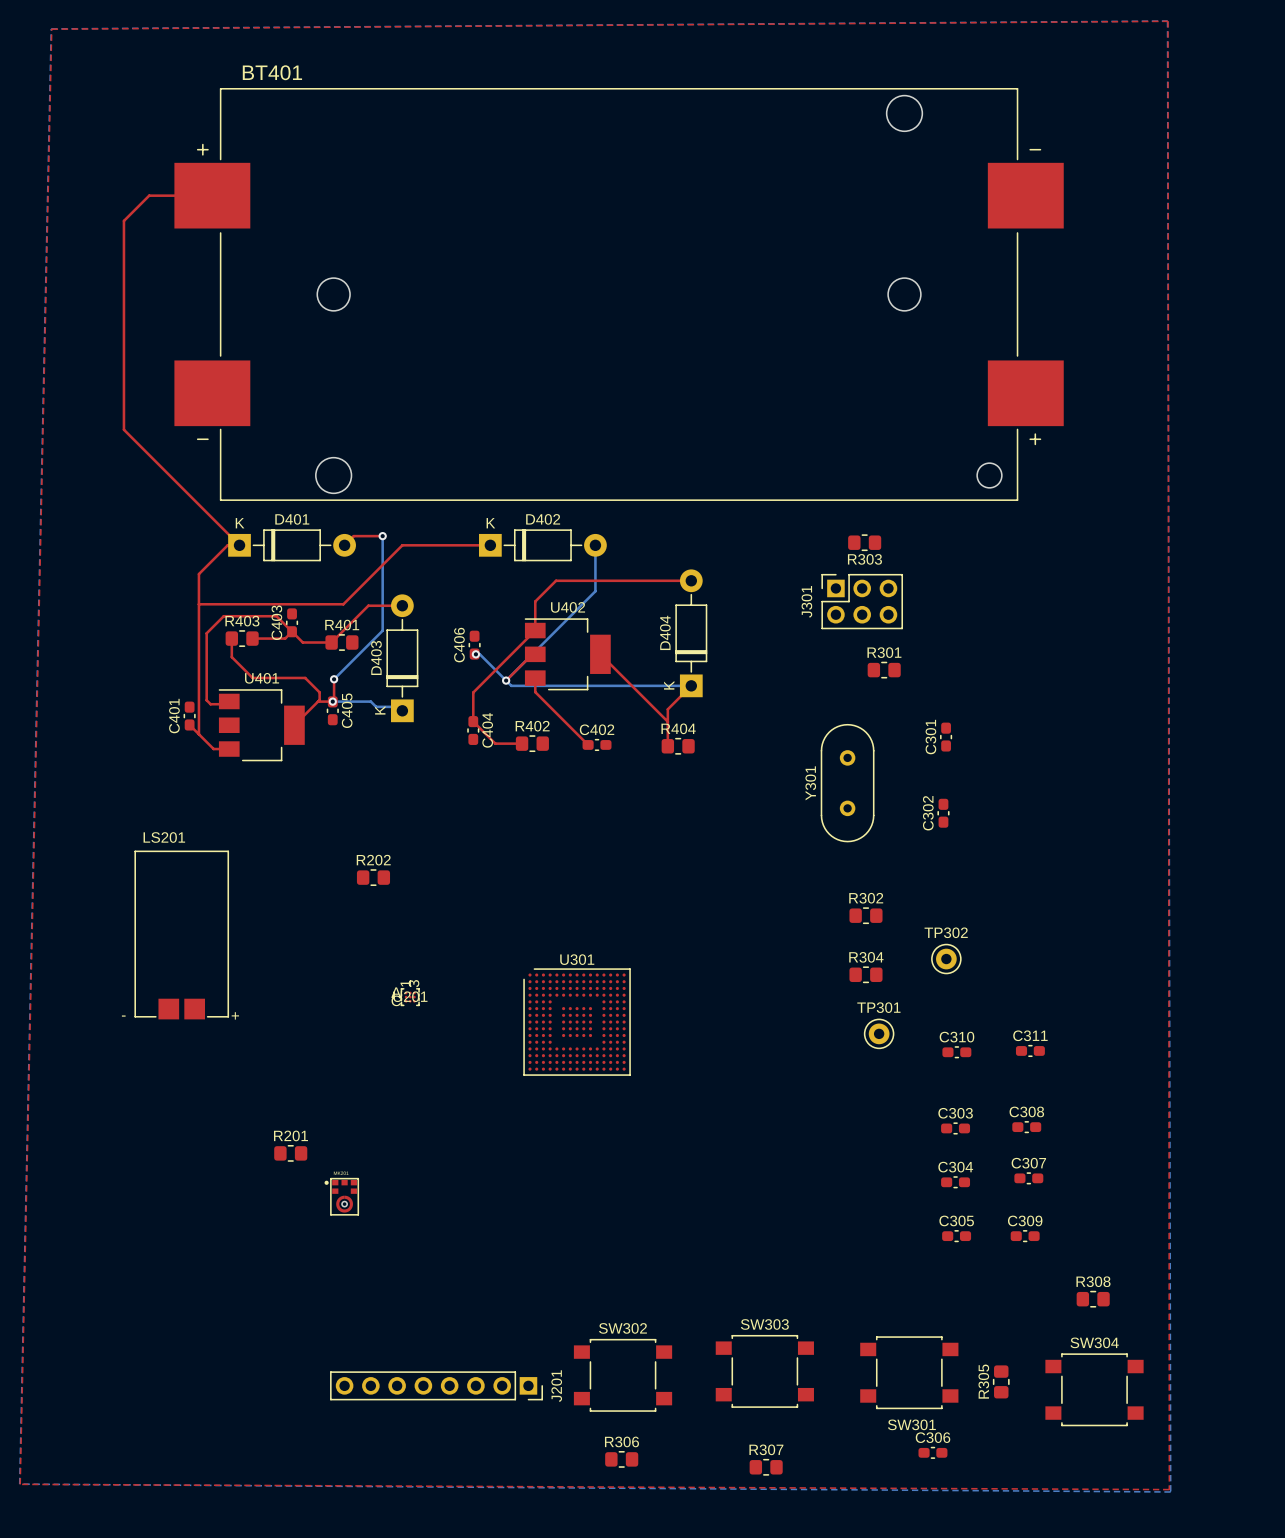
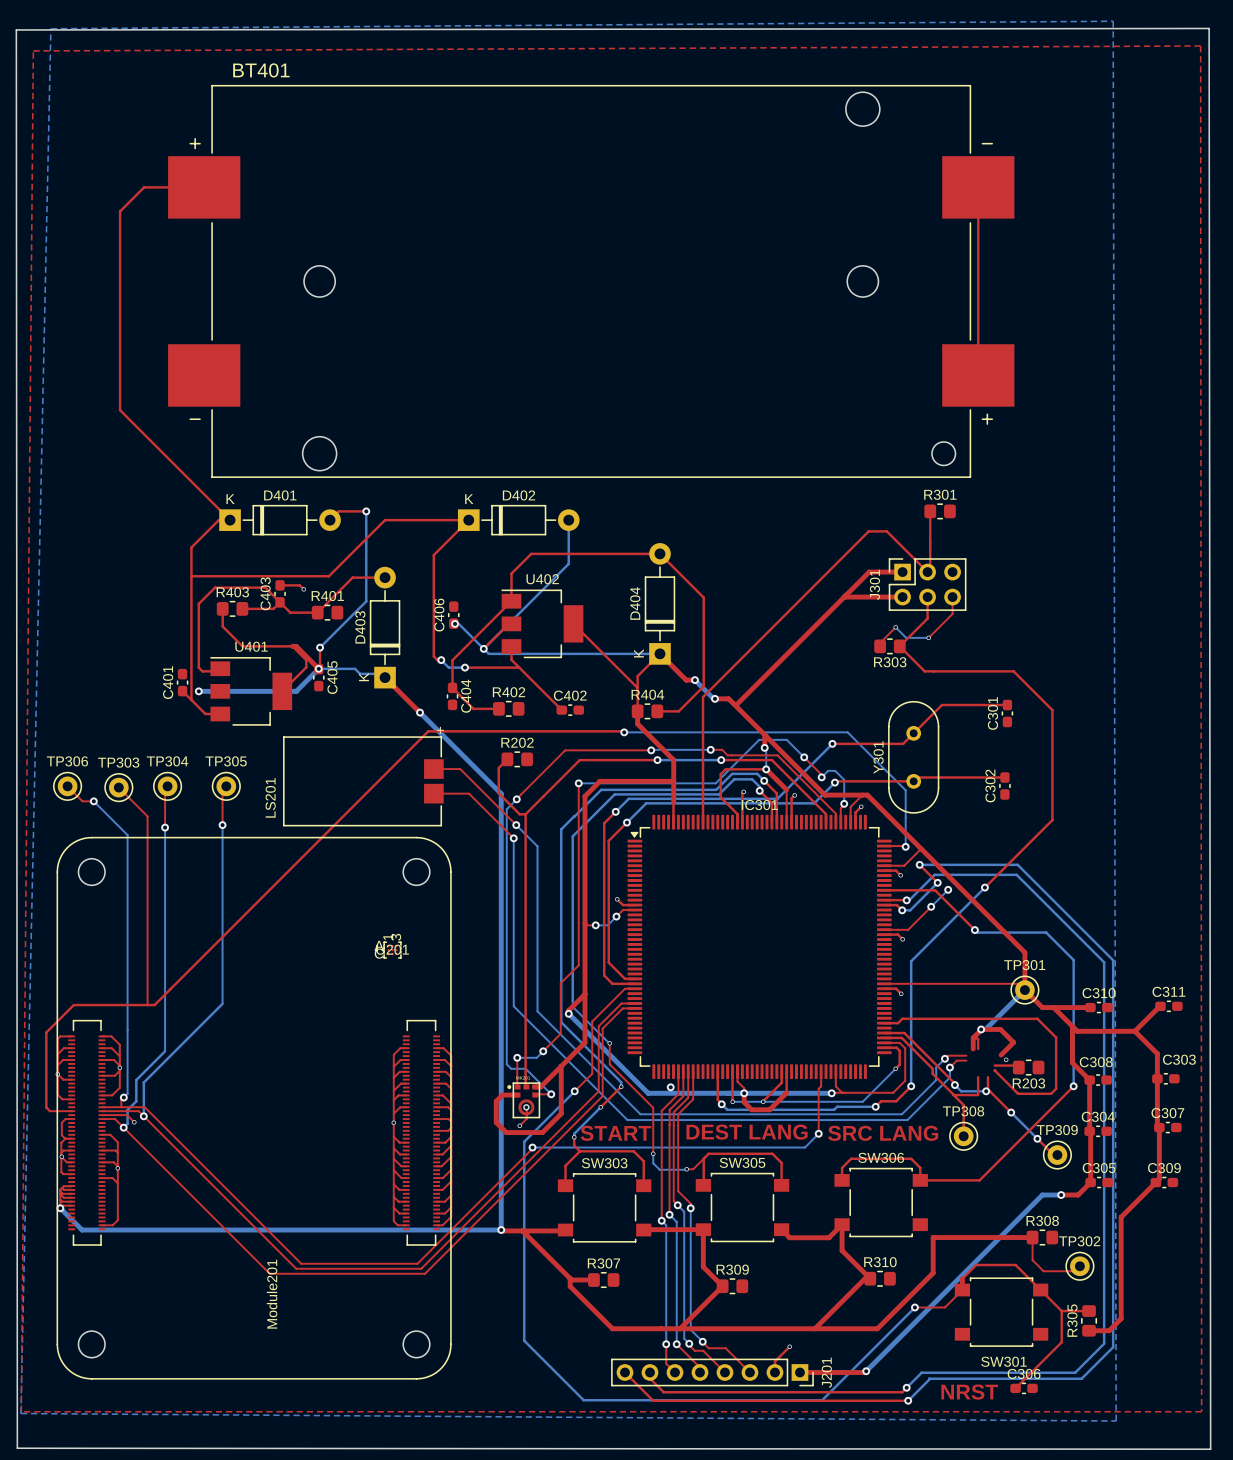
top zone outline: (1168, 21) (51, 29) (20, 1484) (1169, 1489) (1168, 21) -> (1200, 45) (33, 50) (21, 1411) (1201, 1411) (1200, 45)
board edge: none -> (1209, 28) (1210, 1449) (17, 1448) (16, 29) (1209, 28)
top track: none -> (978, 187) (978, 375)
top track: none -> (930, 511) (930, 569) (927, 572) (886, 531) (868, 531) (703, 697) (703, 822)
R303 position: (864, 542) -> (889, 646)
top track: none -> (468, 520) (433, 555) (433, 656) (437, 660) (441, 660)
top track: none -> (659, 553) (703, 597) (703, 686) (678, 711) (657, 711)
top track: none -> (902, 572) (869, 572) (737, 703) (733, 703)
J301 position: (862, 601) -> (927, 584)
top track: none -> (280, 585) (299, 585) (303, 589)
via: none -> (303, 589)
top track: none -> (844, 597) (902, 597)
top track: none -> (927, 597) (927, 618) (899, 646) (924, 671) (1013, 671) (1052, 710) (1052, 820) (984, 887)
top track: none -> (952, 597) (952, 613) (928, 637)
top track: none -> (895, 627) (880, 642) (880, 646)
bottom track: none -> (895, 627) (906, 637) (928, 637)
via: none -> (895, 627)
via: none -> (928, 637)
R301 position: (884, 670) -> (940, 511)
top track: none -> (659, 653) (686, 680) (694, 680)
bottom track: none -> (441, 660) (448, 667) (465, 667)
via: none -> (441, 660)
via: none -> (465, 667)
top track: none -> (519, 667) (465, 667)
top track: (318, 701) (332, 701) -> (292, 646) (296, 646) (318, 668)
bottom track: none -> (318, 668) (296, 691) (198, 691)
top track: none -> (385, 677) (420, 712)
via: none -> (694, 680)
bottom track: none -> (696, 680) (714, 698)
via: none -> (198, 691)
top track: none -> (714, 698) (728, 698) (824, 795) (867, 795) (1024, 952) (1024, 990)
via: none -> (714, 698)
C301 position: (946, 737) -> (1007, 713)
top track: none -> (1007, 705) (942, 705) (903, 743) (832, 743)
top track: none -> (637, 711) (637, 724) (673, 760) (673, 822)
bottom track: none -> (420, 712) (501, 793) (501, 1230) (82, 1230) (60, 1208)
via: none -> (420, 712)
top track: none -> (624, 732) (428, 731) (154, 1005) (73, 1005) (46, 1032) (46, 1107) (49, 1111) (71, 1111)
bottom track: none -> (624, 732) (847, 732) (905, 790) (905, 846)
via: none -> (624, 732)
top track: none -> (765, 735) (764, 747)
bottom track: none -> (832, 743) (777, 798) (628, 798) (615, 811)
via: none -> (832, 743)
Y301 position: (847, 783) -> (913, 757)
bottom track: none -> (764, 747) (766, 769)
via: none -> (764, 747)
top track: none -> (710, 749) (722, 749) (727, 755) (777, 755) (835, 813) (835, 822)
bottom track: none -> (710, 749) (651, 750)
via: none -> (710, 749)
top track: none -> (651, 750) (565, 750) (516, 799)
via: none -> (651, 750)
top track: none -> (804, 757) (821, 774) (821, 777)
bottom track: none -> (804, 757) (786, 739) (759, 739) (715, 783) (578, 783)
via: none -> (804, 757)
top track: none -> (507, 759) (498, 768) (498, 793) (519, 814) (525, 814)
top track: none -> (657, 760) (579, 760) (525, 814)
bottom track: none -> (657, 760) (721, 760)
via: none -> (657, 760)
top track: none -> (721, 760) (772, 760) (826, 814) (826, 822)
via: none -> (721, 760)
top track: none -> (433, 769) (460, 769) (516, 825)
via: none -> (766, 769)
C302 position: (943, 813) -> (1004, 785)
bottom track: none -> (821, 777) (828, 770) (835, 770) (844, 779) (844, 803)
via: none -> (821, 777)
top track: none -> (1004, 777) (917, 777) (913, 781) (834, 782)
top track: none -> (673, 781) (599, 781) (585, 796) (585, 1042) (540, 1086) (534, 1086)
top track: none -> (764, 780) (776, 793) (776, 822)
bottom track: none -> (764, 780) (757, 773) (732, 773) (716, 789) (601, 789) (561, 829) (561, 1022) (621, 1082) (621, 1086)
via: none -> (764, 780)
top track: none -> (578, 783) (578, 965) (560, 983) (560, 1033) (543, 1051)
via: none -> (578, 783)
bottom track: none -> (834, 782) (814, 803) (646, 803) (626, 822)
via: none -> (834, 782)
top track: none -> (67, 786) (82, 801) (93, 801)
TP306: none -> (67, 786)
top track: none -> (167, 786) (165, 788) (165, 827)
TP304: none -> (167, 786)
top track: none -> (226, 786) (222, 790) (222, 825)
TP305: none -> (226, 786)
top track: none -> (118, 787) (147, 816) (147, 1005)
TP303: none -> (118, 787)
top track: none -> (759, 790) (771, 803) (771, 822)
bottom track: none -> (759, 790) (759, 786) (752, 779) (734, 779) (719, 794) (614, 794) (572, 836) (572, 1006) (609, 1043)
via: none -> (759, 790)
top track: none -> (743, 791) (742, 822)
via: none -> (743, 791)
top track: none -> (433, 793) (469, 793) (513, 838)
top track: none -> (794, 795) (791, 798) (791, 822)
via: none -> (794, 795)
top track: none -> (862, 795) (850, 806) (850, 822)
LS201 name position: LS201 (164, 837) -> LS201 (270, 797)
bottom track: none -> (516, 799) (506, 809) (506, 1064) (511, 1068) (525, 1068) (551, 1094)
via: none -> (516, 799)
bottom track: none -> (93, 801) (127, 835) (127, 1093) (123, 1097)
via: none -> (93, 801)
top track: none -> (844, 803) (840, 808) (840, 822)
via: none -> (844, 803)
top track: none -> (861, 806) (855, 812) (855, 822)
via: none -> (861, 806)
LS201 footprint: [134, 850, 229, 1020] -> [283, 736, 444, 827]
top track: none -> (615, 811) (604, 823) (604, 975) (612, 983) (634, 983)
via: none -> (615, 811)
top track: none -> (525, 814) (525, 1086)
top track: none -> (737, 822) (737, 814) (720, 797) (720, 774) (725, 769) (766, 769) (786, 789) (786, 822)
top track: none -> (626, 822) (608, 840) (608, 962) (625, 978) (634, 978)
via: none -> (626, 822)
bottom track: none -> (222, 825) (222, 1003) (143, 1082) (143, 1116)
via: none -> (222, 825)
bottom track: none -> (516, 825) (537, 846) (537, 1011) (640, 1114) (901, 1114) (936, 1080) (936, 1067) (944, 1058)
via: none -> (516, 825)
bottom track: none -> (165, 827) (165, 1051) (136, 1080) (136, 1101) (127, 1110) (127, 1123) (123, 1127)
via: none -> (165, 827)
R202 position: (373, 877) -> (517, 759)
bottom track: none -> (513, 838) (513, 1006) (627, 1120) (907, 1120) (949, 1077) (949, 1067)
via: none -> (513, 838)
top track: none -> (884, 846) (904, 846)
via: none -> (905, 846)
top track: none -> (921, 848) (904, 865) (884, 865)
top track: none -> (919, 864) (937, 882)
bottom track: none -> (919, 864) (1017, 864) (1113, 960) (1113, 1347) (1081, 1378) (929, 1378) (908, 1400)
via: none -> (919, 864)
top track: none -> (884, 870) (896, 870) (900, 875)
R302: (865, 915) -> none
via: none -> (900, 875)
bottom track: none -> (937, 882) (910, 910) (902, 910)
via: none -> (937, 882)
bottom track: none -> (984, 887) (911, 961) (911, 1086)
via: none -> (984, 887)
bottom track: none -> (948, 889) (931, 906)
via: none -> (948, 889)
top track: none -> (884, 890) (935, 890) (974, 930)
top track: none -> (617, 899) (623, 905) (634, 905)
via: none -> (617, 899)
TP302 footprint: [931, 943, 962, 975] -> [1065, 1251, 1095, 1281]
top track: none -> (884, 900) (906, 900)
bottom track: none -> (906, 900) (909, 900) (934, 874) (1016, 874) (1104, 962) (1104, 1343) (1075, 1372) (921, 1372) (906, 1387)
via: none -> (906, 900)
top track: none -> (884, 905) (896, 905) (902, 910)
top track: none -> (931, 906) (908, 929) (884, 929)
via: none -> (931, 906)
top track: none -> (634, 910) (623, 910) (616, 916)
via: none -> (902, 910)
bottom track: none -> (616, 916) (607, 925) (595, 925)
via: none -> (616, 916)
top track: none -> (585, 923) (587, 925) (595, 925)
via: none -> (595, 925)
R304: (865, 974) -> none
bottom track: none -> (974, 930) (977, 932) (1046, 932) (1073, 960) (1073, 1086)
via: none -> (974, 930)
top track: none -> (884, 934) (897, 934) (901, 938)
via: none -> (902, 939)
IC301: none -> (759, 946)
U301: (577, 1022) -> none
top track: none -> (884, 983) (1018, 983) (1024, 990)
TP301 position: (879, 1033) -> (1024, 990)
top track: none -> (634, 988) (625, 988) (592, 1021) (592, 1073) (574, 1091)
top track: none -> (884, 988) (896, 988) (900, 993)
top track: none -> (1024, 990) (1042, 1007) (1090, 1007)
bottom track: none -> (1024, 990) (985, 1029) (981, 1029)
top track: none -> (585, 994) (568, 1010) (568, 1013)
via: none -> (901, 993)
C311 position: (1030, 1050) -> (1168, 1006)
C310 position: (956, 1052) -> (1098, 1007)
top track: none -> (634, 1003) (621, 1003) (598, 1026) (598, 1091) (421, 1268) (296, 1268) (138, 1111) (102, 1111)
top track: none -> (1160, 1006) (1134, 1031)
top track: none -> (1053, 1007) (1077, 1031) (1134, 1031)
top track: none -> (634, 1008) (622, 1008) (602, 1028) (602, 1096) (425, 1273) (269, 1273) (115, 1119) (102, 1119)
bottom track: none -> (568, 1013) (648, 1093) (831, 1093)
via: none -> (568, 1013)
top track: none -> (884, 1023) (898, 1023) (902, 1018) (1037, 1018) (1056, 1037) (1056, 1088) (1051, 1093) (1018, 1093) (995, 1070)
top track: none -> (1072, 1026) (1072, 1062) (1090, 1081)
via: none -> (981, 1029)
top track: none -> (1134, 1031) (1157, 1053) (1159, 1179) (1121, 1217) (1121, 1318) (1109, 1330) (1089, 1330)
top track: none -> (884, 1033) (904, 1033) (954, 1085)
top track: none -> (71, 1036) (60, 1036) (57, 1038) (57, 1094) (62, 1099) (71, 1099)
top track: none -> (102, 1036) (111, 1036) (119, 1044) (119, 1087) (112, 1095) (102, 1095)
top track: none -> (974, 1036) (978, 1039) (978, 1048)
top track: none -> (884, 1037) (901, 1037) (932, 1068) (932, 1073) (953, 1095)
top track: none -> (884, 1042) (899, 1042) (905, 1048) (905, 1080) (893, 1092) (831, 1093)
top track: none -> (609, 1043) (609, 1064) (653, 1107) (653, 1153)
via: none -> (609, 1043)
top track: none -> (884, 1047) (896, 1047) (899, 1050) (899, 1064) (895, 1068)
top track: none -> (71, 1048) (63, 1048) (57, 1054)
top track: none -> (102, 1048) (111, 1048) (119, 1056)
top track: none -> (406, 1048) (400, 1048) (393, 1054) (393, 1221) (397, 1225) (406, 1225)
top track: none -> (436, 1048) (443, 1048) (451, 1055) (451, 1216) (442, 1225) (436, 1225)
top track: none -> (973, 1048) (973, 1037) (981, 1029) (1000, 1029) (1013, 1042) (1001, 1055)
bottom track: none -> (543, 1051) (536, 1057) (517, 1057)
via: none -> (543, 1051)
top track: none -> (966, 1055) (948, 1055) (944, 1058)
top track: none -> (517, 1057) (516, 1086)
via: none -> (517, 1057)
via: none -> (944, 1058)
C308 name position: C308 (1026, 1111) -> C308 (1096, 1062)
top track: none -> (71, 1060) (63, 1060) (57, 1065)
top track: none -> (102, 1060) (114, 1060) (119, 1065)
top track: none -> (406, 1060) (400, 1060) (393, 1066)
top track: none -> (436, 1060) (444, 1060) (451, 1066)
via: none -> (1006, 1059)
C303 name position: C303 (955, 1113) -> C303 (1179, 1059)
top track: none -> (966, 1060) (956, 1060) (949, 1067)
top track: none -> (994, 1065) (1016, 1065) (1018, 1067)
top track: none -> (561, 1066) (561, 1113) (542, 1132) (506, 1132) (496, 1122) (496, 1101) (502, 1095) (516, 1095)
via: none -> (119, 1067)
via: none -> (949, 1067)
R203: none -> (1028, 1067)
bottom track: none -> (895, 1068) (862, 1101) (732, 1101)
via: none -> (895, 1068)
top track: none -> (119, 1070) (114, 1075) (102, 1075)
top track: none -> (678, 1071) (678, 1094) (661, 1110) (661, 1220)
top track: none -> (683, 1071) (683, 1096) (669, 1109) (669, 1124)
top track: none -> (688, 1071) (688, 1097) (673, 1112) (673, 1201) (677, 1205)
top track: none -> (693, 1071) (693, 1099) (678, 1114) (678, 1191) (690, 1203) (690, 1208)
top track: none -> (717, 1071) (717, 1099) (721, 1104)
top track: none -> (732, 1071) (732, 1101)
top track: none -> (737, 1071) (737, 1081) (744, 1088) (744, 1102) (751, 1109) (769, 1109) (786, 1092) (786, 1071)
top track: none -> (781, 1071) (781, 1082) (762, 1101)
top track: none -> (821, 1071) (821, 1086)
top track: none -> (835, 1071) (835, 1086) (842, 1092)
top track: none -> (406, 1071) (399, 1071) (393, 1077)
top track: none -> (436, 1071) (445, 1071) (451, 1077)
top track: none -> (57, 1074) (63, 1079) (71, 1079)
via: none -> (57, 1074)
C308 position: (1026, 1127) -> (1165, 1078)
C303 position: (955, 1128) -> (1098, 1080)
top track: none -> (978, 1077) (977, 1095) (953, 1095)
top track: none -> (988, 1077) (988, 1089) (986, 1091) (989, 1091) (1011, 1112)
top track: none -> (1089, 1080) (1090, 1182) (1078, 1195) (1061, 1195)
top track: none -> (406, 1083) (400, 1083) (393, 1090)
top track: none -> (436, 1083) (446, 1083) (451, 1088)
bottom track: none -> (954, 1085) (961, 1091) (986, 1091)
via: none -> (954, 1085)
top track: none -> (621, 1086) (600, 1107)
via: none -> (621, 1086)
top track: none -> (821, 1086) (818, 1088) (818, 1133)
top track: none -> (911, 1086) (896, 1101) (881, 1101) (875, 1106)
via: none -> (911, 1086)
top track: none -> (1073, 1086) (979, 1180) (920, 1180) (920, 1167) (911, 1158) (851, 1158) (842, 1167) (842, 1180)
via: none -> (1073, 1086)
via: none -> (670, 1087)
bottom track: none -> (574, 1091) (524, 1141) (524, 1340) (583, 1400) (822, 1400) (914, 1307)
via: none -> (574, 1091)
via: none -> (986, 1091)
via: none -> (744, 1093)
via: none -> (831, 1093)
top track: none -> (551, 1094) (534, 1095)
via: none -> (551, 1094)
top track: none -> (406, 1095) (398, 1095) (393, 1100)
top track: none -> (436, 1095) (442, 1095) (451, 1103)
top track: none -> (953, 1095) (963, 1105) (963, 1136)
top track: none -> (123, 1097) (121, 1100) (121, 1107)
via: none -> (123, 1097)
R201: (290, 1153) -> none
via: none -> (732, 1101)
via: none -> (763, 1101)
bottom track: none -> (721, 1104) (727, 1109) (834, 1109) (837, 1106) (875, 1106)
via: none -> (721, 1104)
top track: none -> (526, 1106) (526, 1118) (519, 1125)
via: none -> (875, 1106)
top track: none -> (102, 1107) (144, 1107) (301, 1263) (417, 1263) (532, 1147)
top track: none -> (406, 1107) (400, 1107) (393, 1113)
top track: none -> (436, 1107) (448, 1107) (451, 1110)
bottom track: none -> (600, 1107) (574, 1133) (574, 1137)
via: none -> (600, 1107)
Module201: none -> (254, 1108)
bottom track: none -> (1011, 1112) (1037, 1138)
via: none -> (1011, 1112)
top track: none -> (102, 1115) (127, 1115) (134, 1122)
via: none -> (143, 1116)
top track: none -> (71, 1119) (65, 1119) (61, 1122) (61, 1135) (65, 1138) (71, 1138)
top track: none -> (436, 1119) (448, 1119) (451, 1121)
via: none -> (134, 1122)
via: none -> (393, 1122)
C307 position: (1028, 1178) -> (1167, 1127)
top track: none -> (669, 1124) (669, 1214)
via: none -> (519, 1125)
C304 position: (955, 1182) -> (1098, 1131)
via: none -> (123, 1127)
top track: none -> (451, 1127) (448, 1130) (436, 1130)
text: none -> DEST LANG (747, 1132)
text: none -> START (615, 1133)
text: none -> SRC LANG (883, 1133)
bottom track: none -> (818, 1133) (804, 1147) (532, 1147)
via: none -> (818, 1133)
top track: none -> (102, 1134) (110, 1134) (117, 1142) (117, 1220) (112, 1225) (102, 1225)
TP308: none -> (963, 1136)
top track: none -> (393, 1136) (399, 1142) (406, 1142)
top track: none -> (451, 1136) (445, 1142) (436, 1142)
top track: none -> (574, 1137) (574, 1145) (580, 1151)
via: none -> (574, 1137)
top track: none -> (65, 1138) (61, 1142) (61, 1172) (63, 1174) (71, 1174)
top track: none -> (1037, 1138) (1053, 1155) (1057, 1155)
via: none -> (1037, 1138)
part position: (341, 1196) -> (523, 1100)
top track: none -> (451, 1145) (442, 1154) (436, 1154)
via: none -> (532, 1147)
top track: none -> (393, 1148) (399, 1154) (406, 1154)
top track: none -> (71, 1150) (63, 1150) (61, 1152)
top track: none -> (102, 1150) (115, 1150) (117, 1152)
top track: none -> (580, 1151) (633, 1151) (643, 1161) (643, 1185)
top track: none -> (580, 1151) (565, 1165) (565, 1185)
bottom track: none -> (653, 1153) (653, 1163) (659, 1169) (686, 1169)
via: none -> (653, 1153)
TP309: none -> (1057, 1155)
top track: none -> (61, 1156) (66, 1162) (71, 1162)
via: none -> (61, 1156)
top track: none -> (451, 1156) (441, 1166) (436, 1166)
top track: none -> (704, 1157) (693, 1169) (686, 1169)
top track: none -> (393, 1158) (401, 1166) (406, 1166)
top track: none -> (102, 1162) (113, 1162) (117, 1166)
via: none -> (117, 1168)
top track: none -> (451, 1169) (442, 1178) (436, 1178)
via: none -> (686, 1169)
top track: none -> (393, 1170) (401, 1178) (406, 1178)
top track: none -> (102, 1178) (112, 1178) (117, 1183)
C305 position: (956, 1236) -> (1099, 1182)
C309 position: (1025, 1236) -> (1164, 1182)
top track: none -> (451, 1181) (442, 1189) (436, 1189)
top track: none -> (393, 1184) (399, 1189) (406, 1189)
top track: none -> (703, 1185) (703, 1158) (708, 1153) (772, 1153) (781, 1162) (781, 1185)
top track: none -> (71, 1185) (63, 1186) (60, 1189) (60, 1208) (62, 1205) (71, 1205)
top track: none -> (62, 1188) (71, 1189)
top track: none -> (60, 1191) (62, 1193) (71, 1193)
top track: none -> (60, 1194) (63, 1197) (71, 1197)
top track: none -> (451, 1195) (444, 1201) (436, 1201)
bottom track: none -> (1061, 1195) (1042, 1195) (866, 1371)
via: none -> (1061, 1195)
top track: none -> (393, 1196) (398, 1201) (406, 1201)
top track: none -> (60, 1199) (62, 1201) (71, 1201)
SW306: none -> (881, 1202)
bottom track: none -> (677, 1205) (684, 1211) (684, 1338) (689, 1343)
via: none -> (677, 1205)
top track: none -> (393, 1207) (399, 1213) (406, 1213)
top track: none -> (451, 1207) (445, 1213) (436, 1213)
SW305: none -> (742, 1207)
via: none -> (60, 1208)
bottom track: none -> (690, 1208) (690, 1329) (702, 1341)
via: none -> (690, 1208)
bottom track: none -> (669, 1214) (676, 1221) (676, 1344)
via: none -> (669, 1214)
bottom track: none -> (661, 1220) (666, 1225) (666, 1344)
via: none -> (661, 1220)
top track: none -> (781, 1229) (789, 1237) (828, 1237) (842, 1224) (842, 1250) (870, 1278) (864, 1278) (814, 1328)
top track: none -> (501, 1230) (560, 1230)
via: none -> (501, 1230)
top track: none -> (643, 1230) (703, 1229) (703, 1266) (722, 1286) (680, 1328)
top track: none -> (522, 1230) (571, 1280) (593, 1280)
top track: none -> (1032, 1237) (1032, 1260) (1043, 1271) (1074, 1271) (1079, 1266)
top track: none -> (1032, 1237) (933, 1237) (933, 1273) (877, 1328) (612, 1328) (570, 1286) (570, 1278)
R310: none -> (880, 1278)
R309: none -> (732, 1286)
SW303 position: (764, 1371) -> (604, 1207)
SW301 position: (909, 1372) -> (1001, 1312)
top track: none -> (914, 1307) (944, 1307) (962, 1290) (962, 1278) (976, 1265) (1015, 1265) (1061, 1311)
via: none -> (914, 1307)
SW302: (623, 1375) -> none
top track: none -> (1061, 1311) (1061, 1342) (1015, 1388)
top track: none -> (1061, 1311) (1089, 1311)
R305 position: (1001, 1381) -> (1089, 1320)
J201 position: (436, 1385) -> (712, 1372)
SW304: (1094, 1389) -> none
top track: none -> (702, 1341) (708, 1348) (725, 1348) (749, 1372)
via: none -> (702, 1341)
top track: none -> (689, 1343) (694, 1350) (703, 1350) (724, 1372)
via: none -> (689, 1343)
top track: none -> (666, 1344) (666, 1363) (674, 1372)
via: none -> (666, 1344)
top track: none -> (676, 1344) (699, 1367) (699, 1372)
via: none -> (676, 1344)
top track: none -> (789, 1346) (774, 1361) (774, 1372)
via: none -> (789, 1346)
top track: none -> (866, 1371) (799, 1372)
via: none -> (866, 1371)
top track: none -> (624, 1372) (653, 1400) (908, 1400)
top track: none -> (649, 1372) (649, 1378) (663, 1392) (902, 1392) (906, 1387)
C306 position: (932, 1452) -> (1024, 1388)
via: none -> (906, 1387)
R306: (621, 1459) -> none
text: none -> NRST (969, 1392)
R307 position: (766, 1467) -> (603, 1280)
via: none -> (908, 1400)

